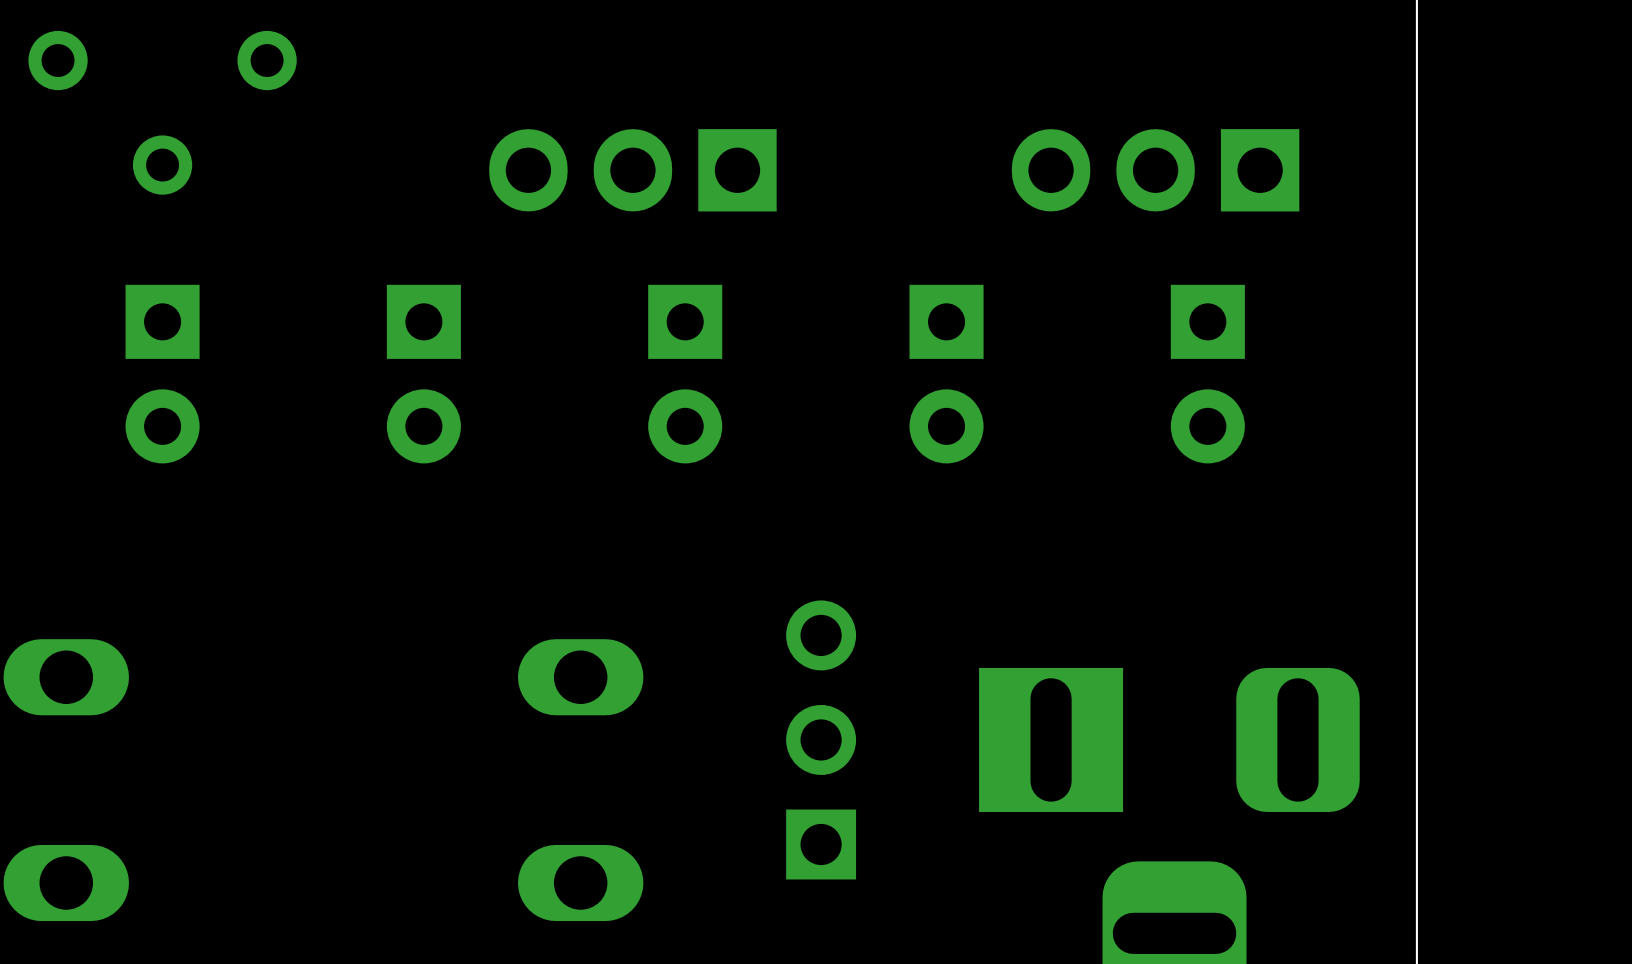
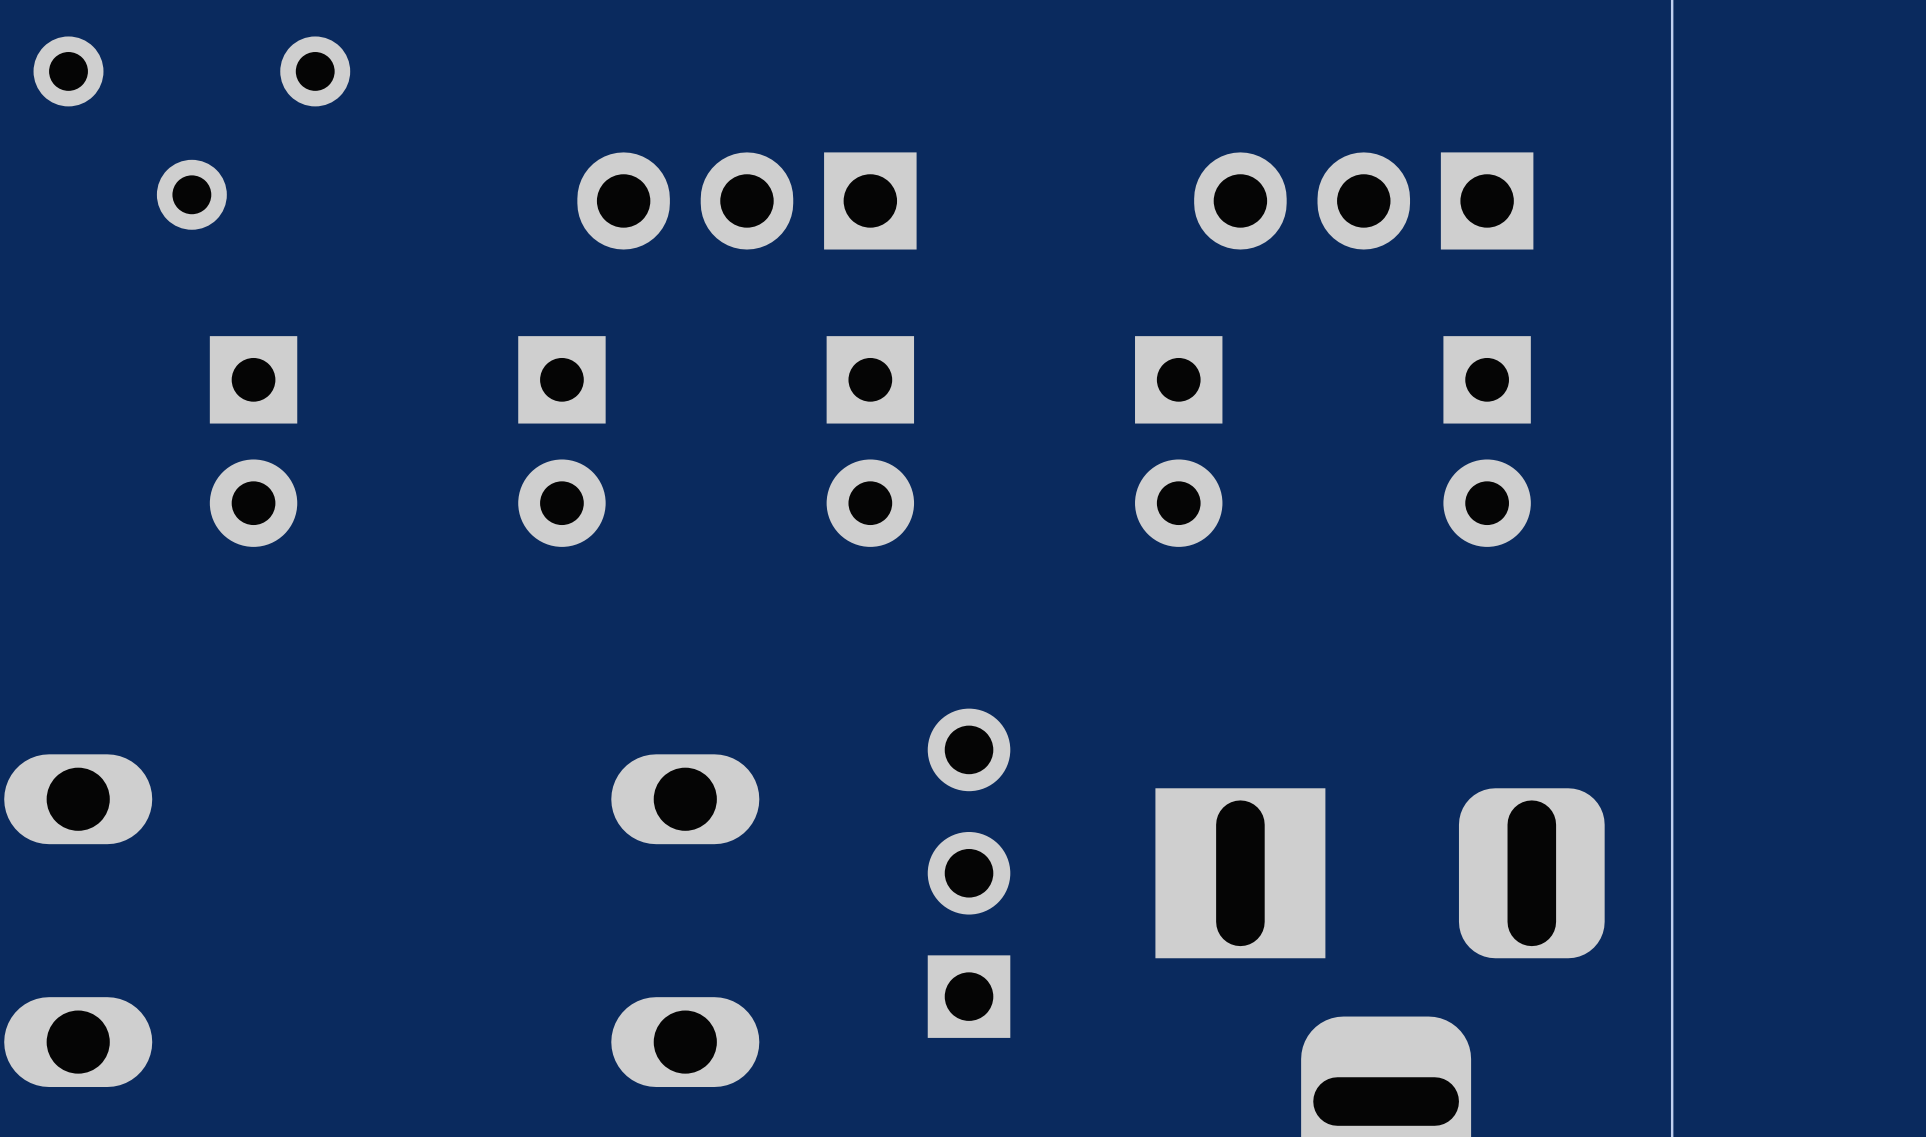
part position: (162, 374) -> (253, 441)
part position: (423, 374) -> (561, 441)
part position: (685, 374) -> (870, 441)
part position: (946, 374) -> (1178, 441)
part position: (1207, 374) -> (1487, 441)

